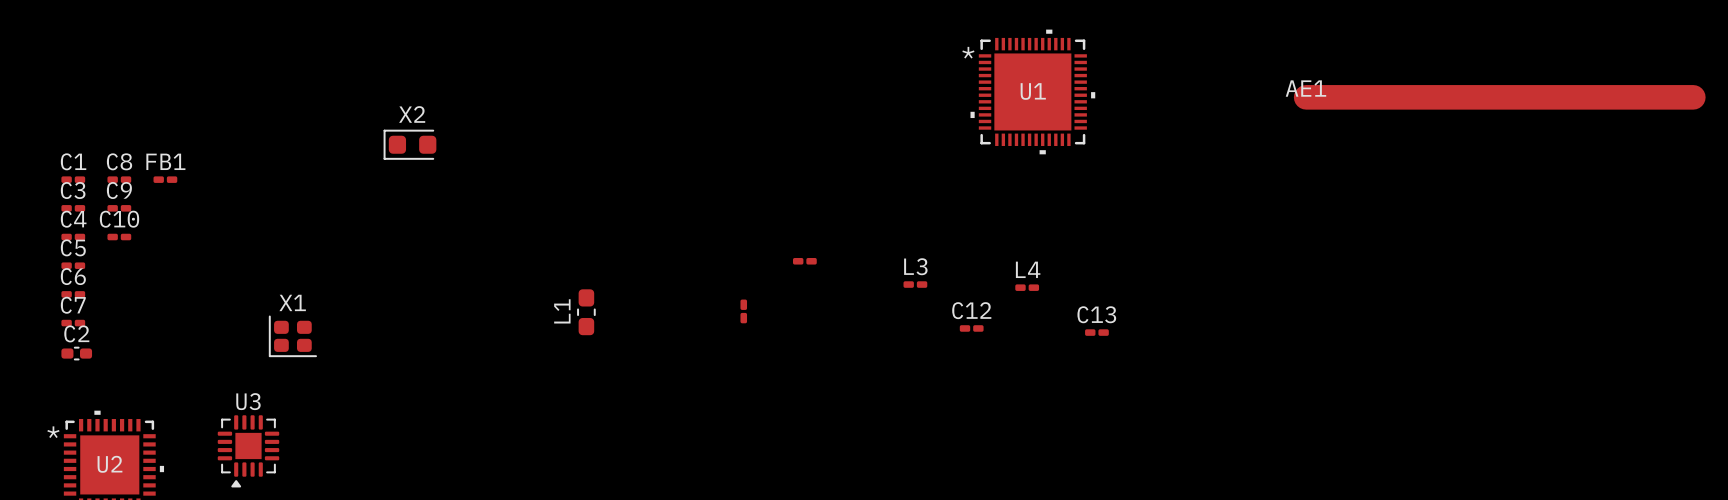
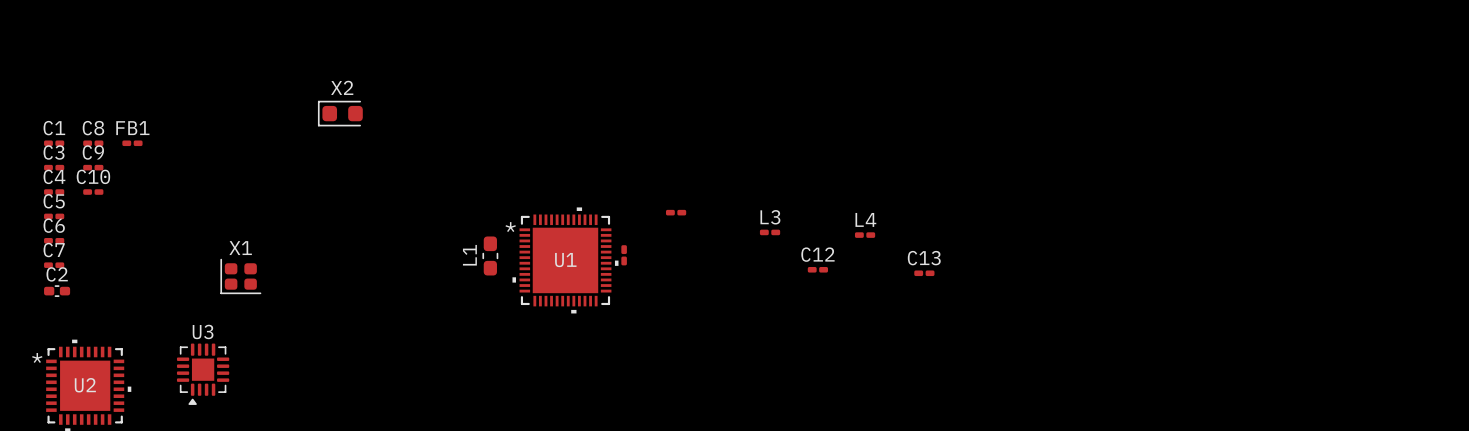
U1 position: (1032, 91) -> (565, 260)
AE1: (1499, 97) -> none

